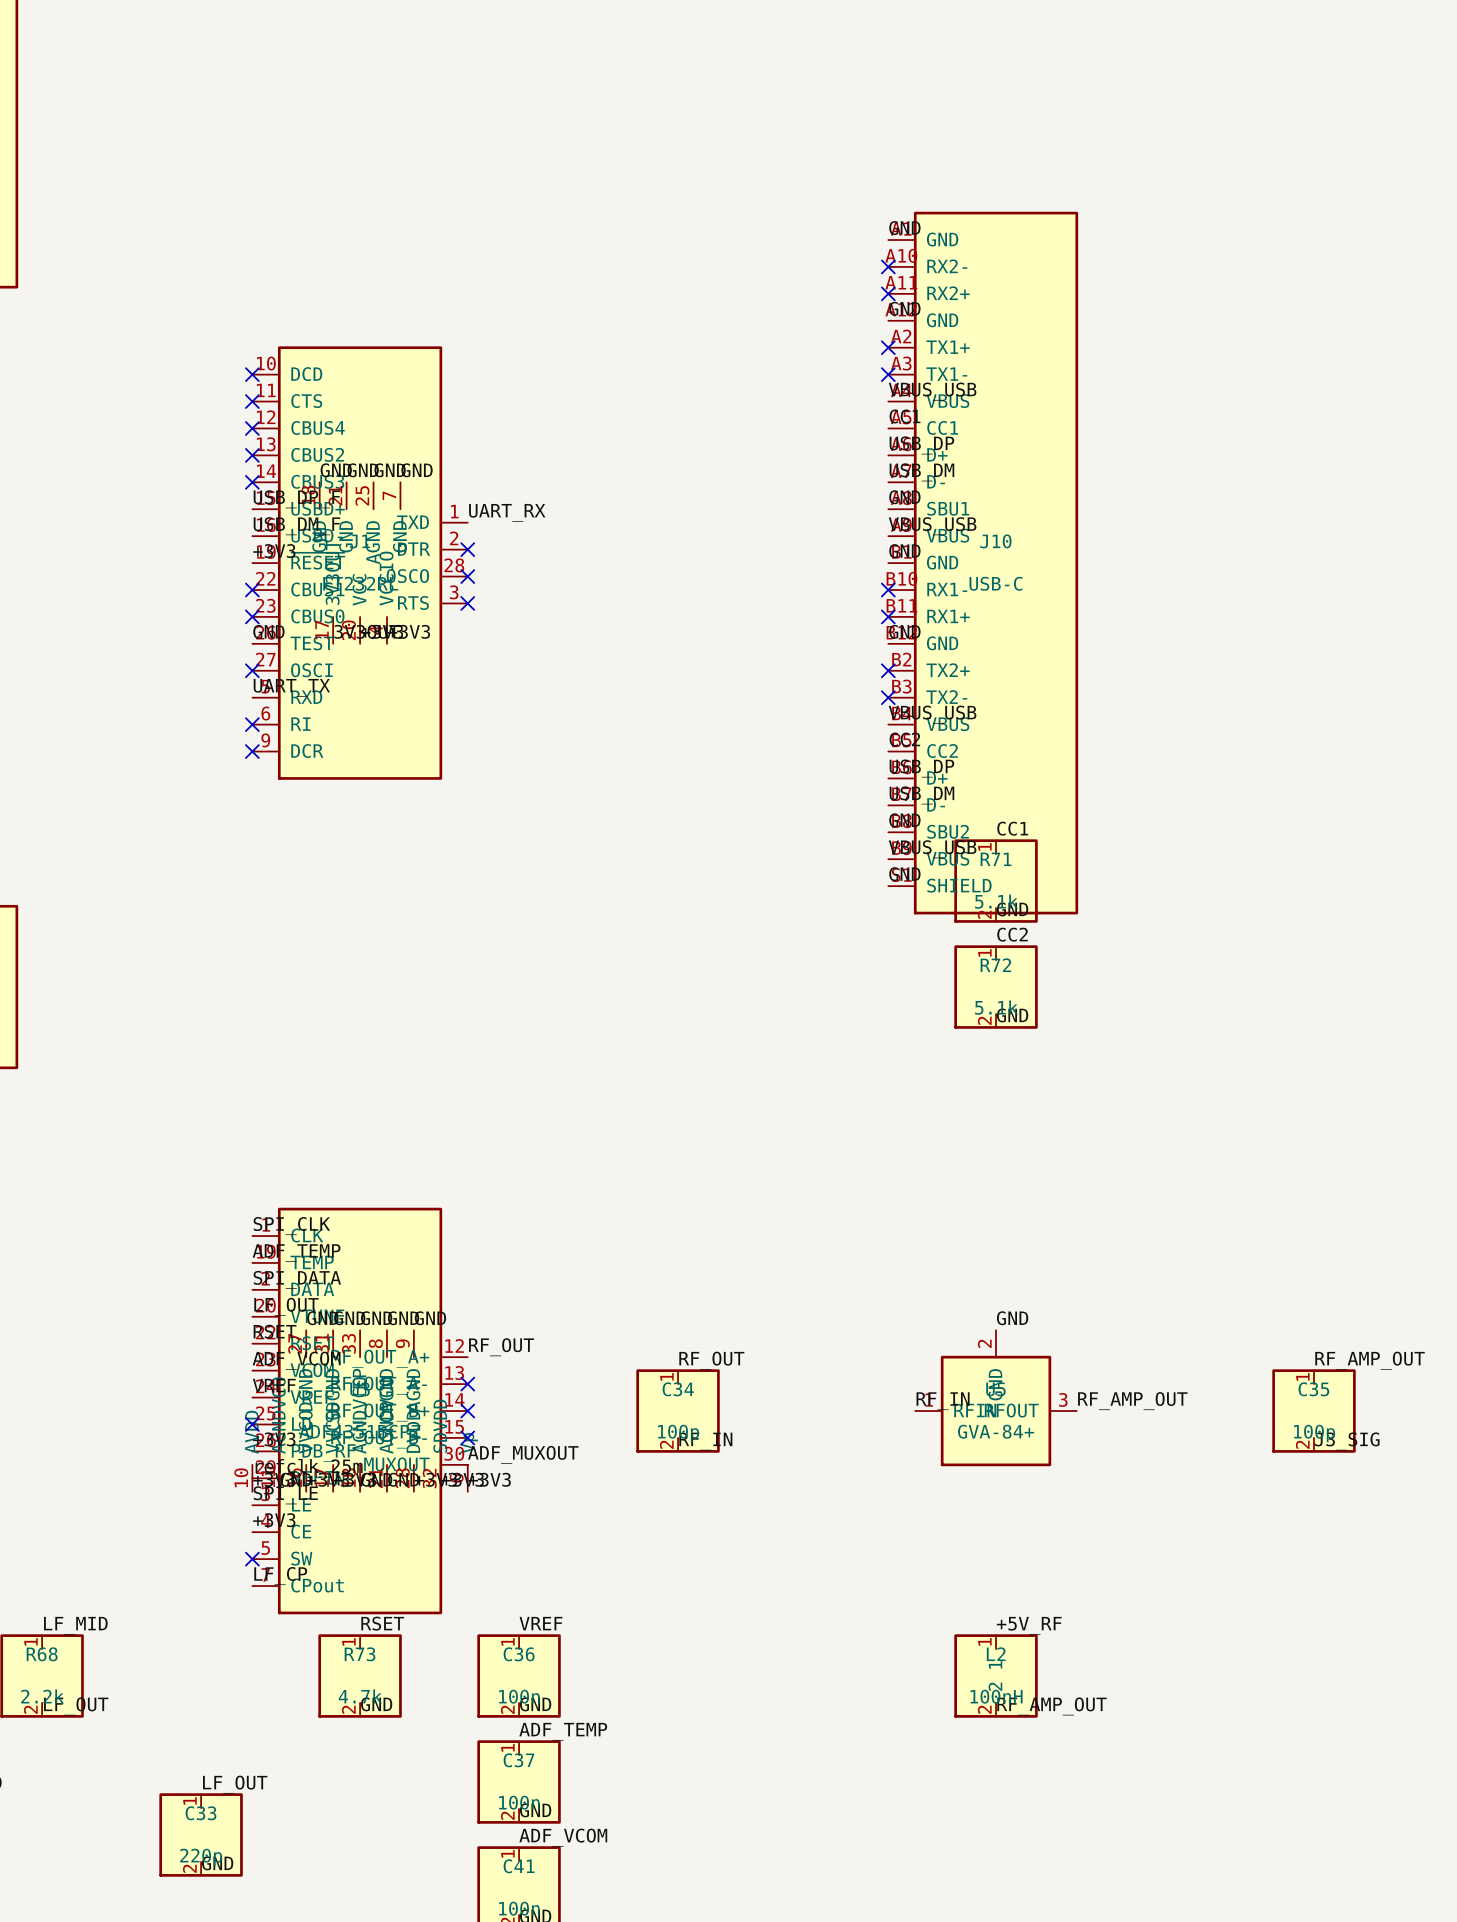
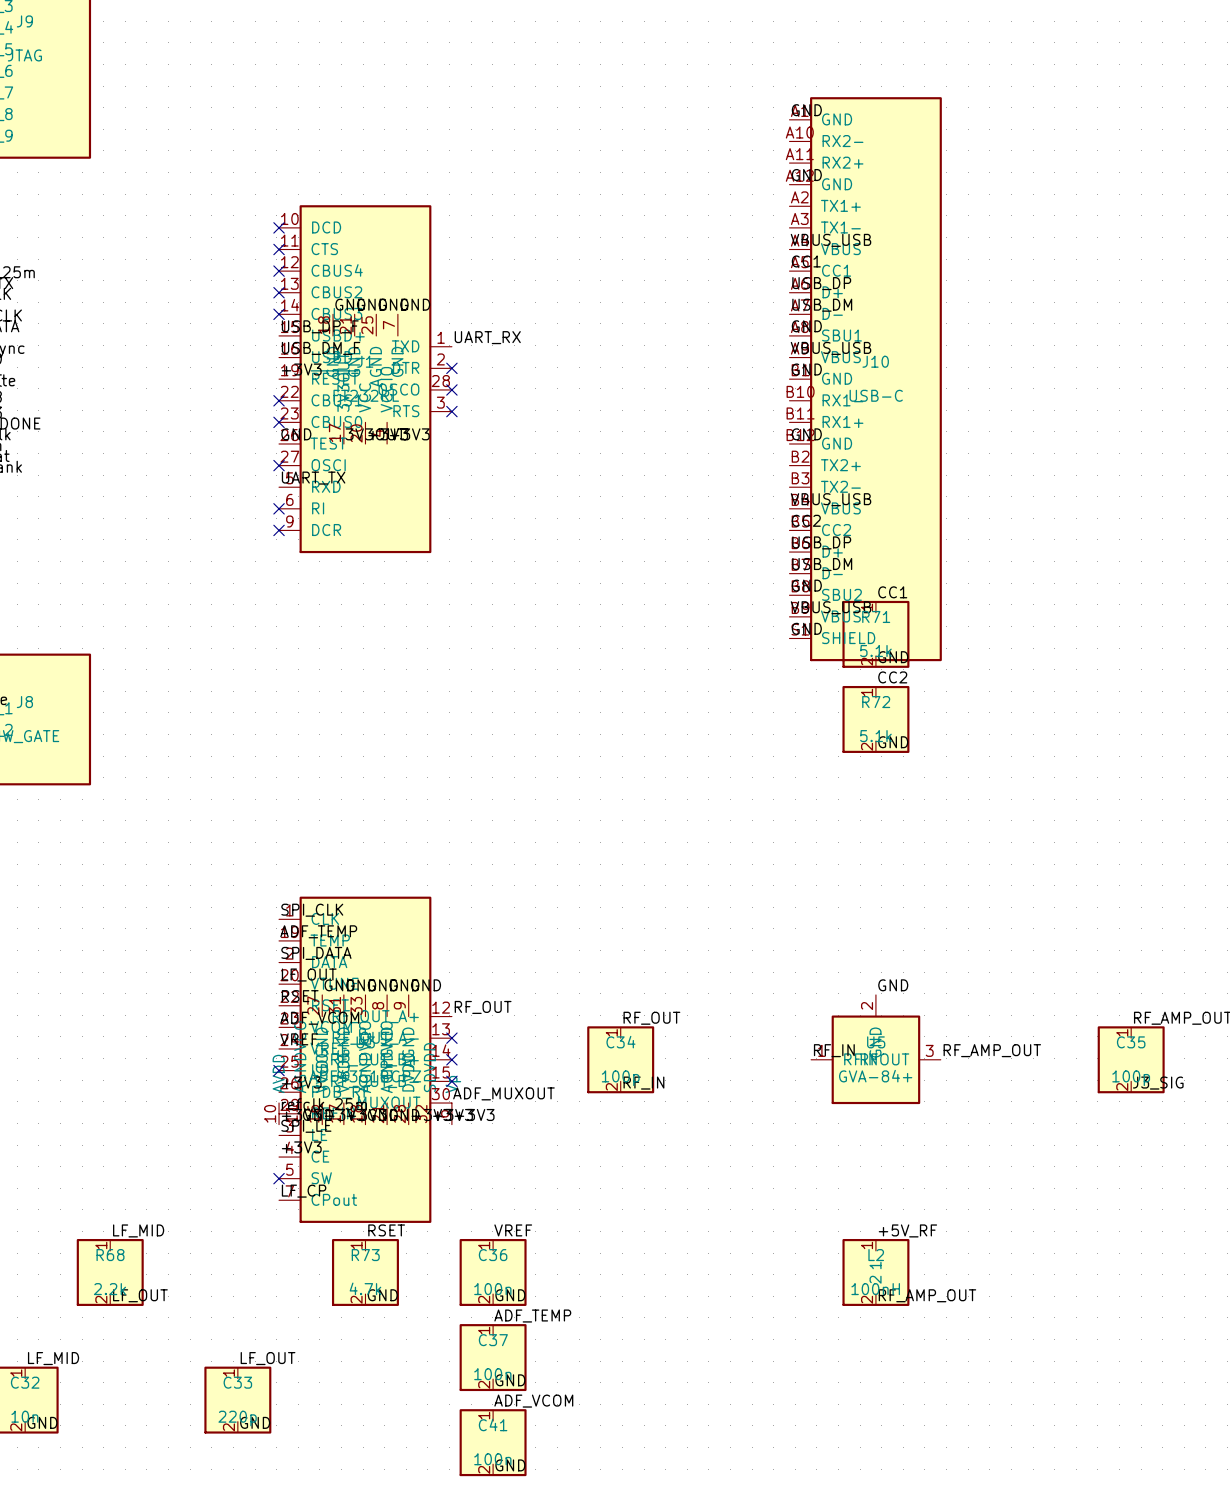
no-connect mark: (888, 266) -> none
no-connect mark: (888, 293) -> none
no-connect mark: (888, 347) -> none
no-connect mark: (888, 374) -> none
no-connect mark: (888, 590) -> none
no-connect mark: (888, 616) -> none
no-connect mark: (888, 670) -> none
no-connect mark: (888, 697) -> none

